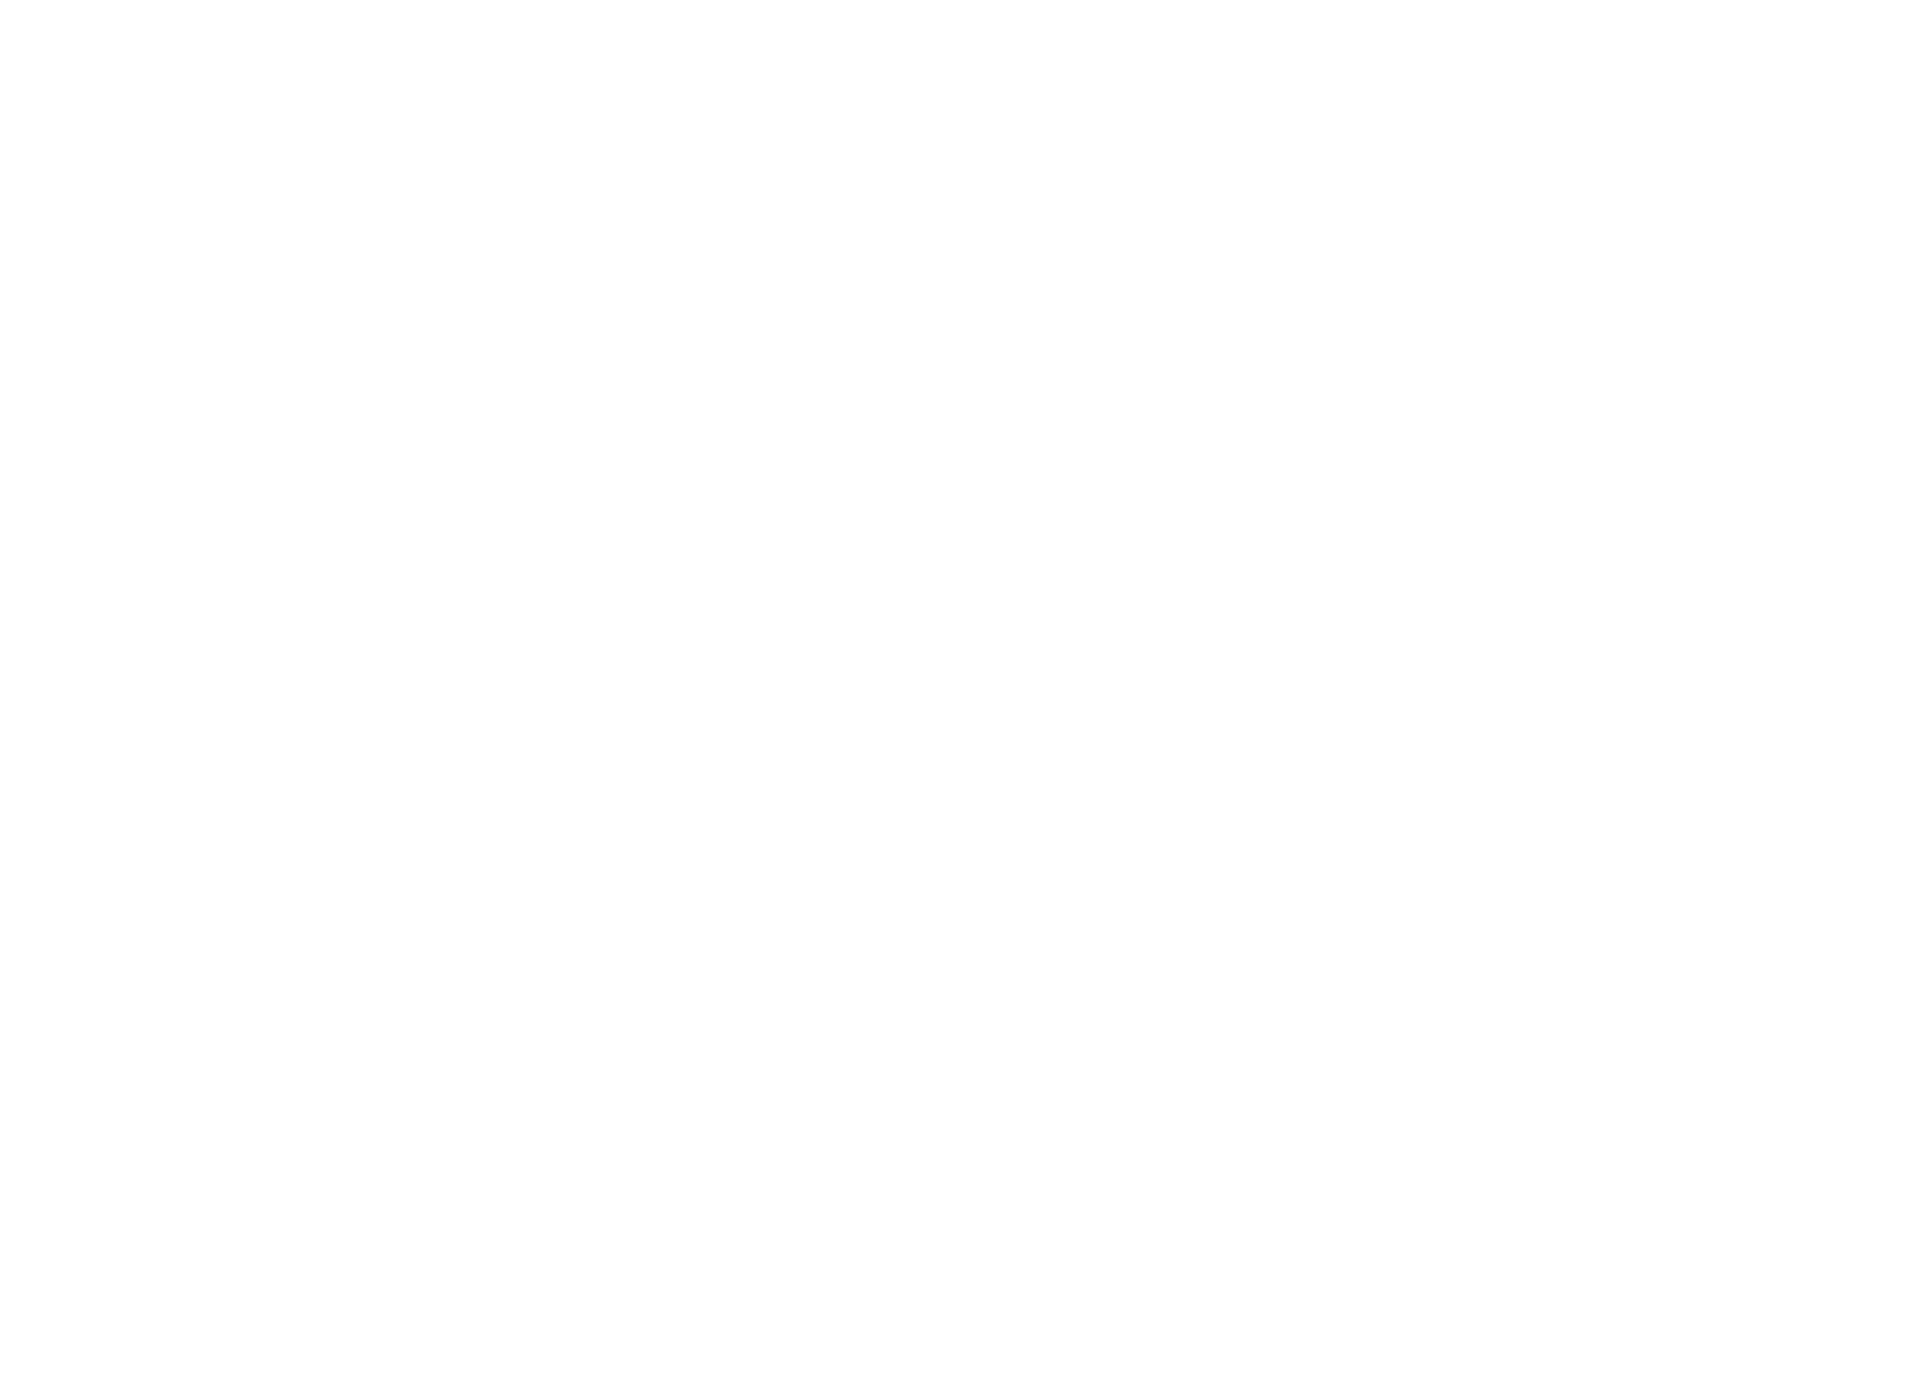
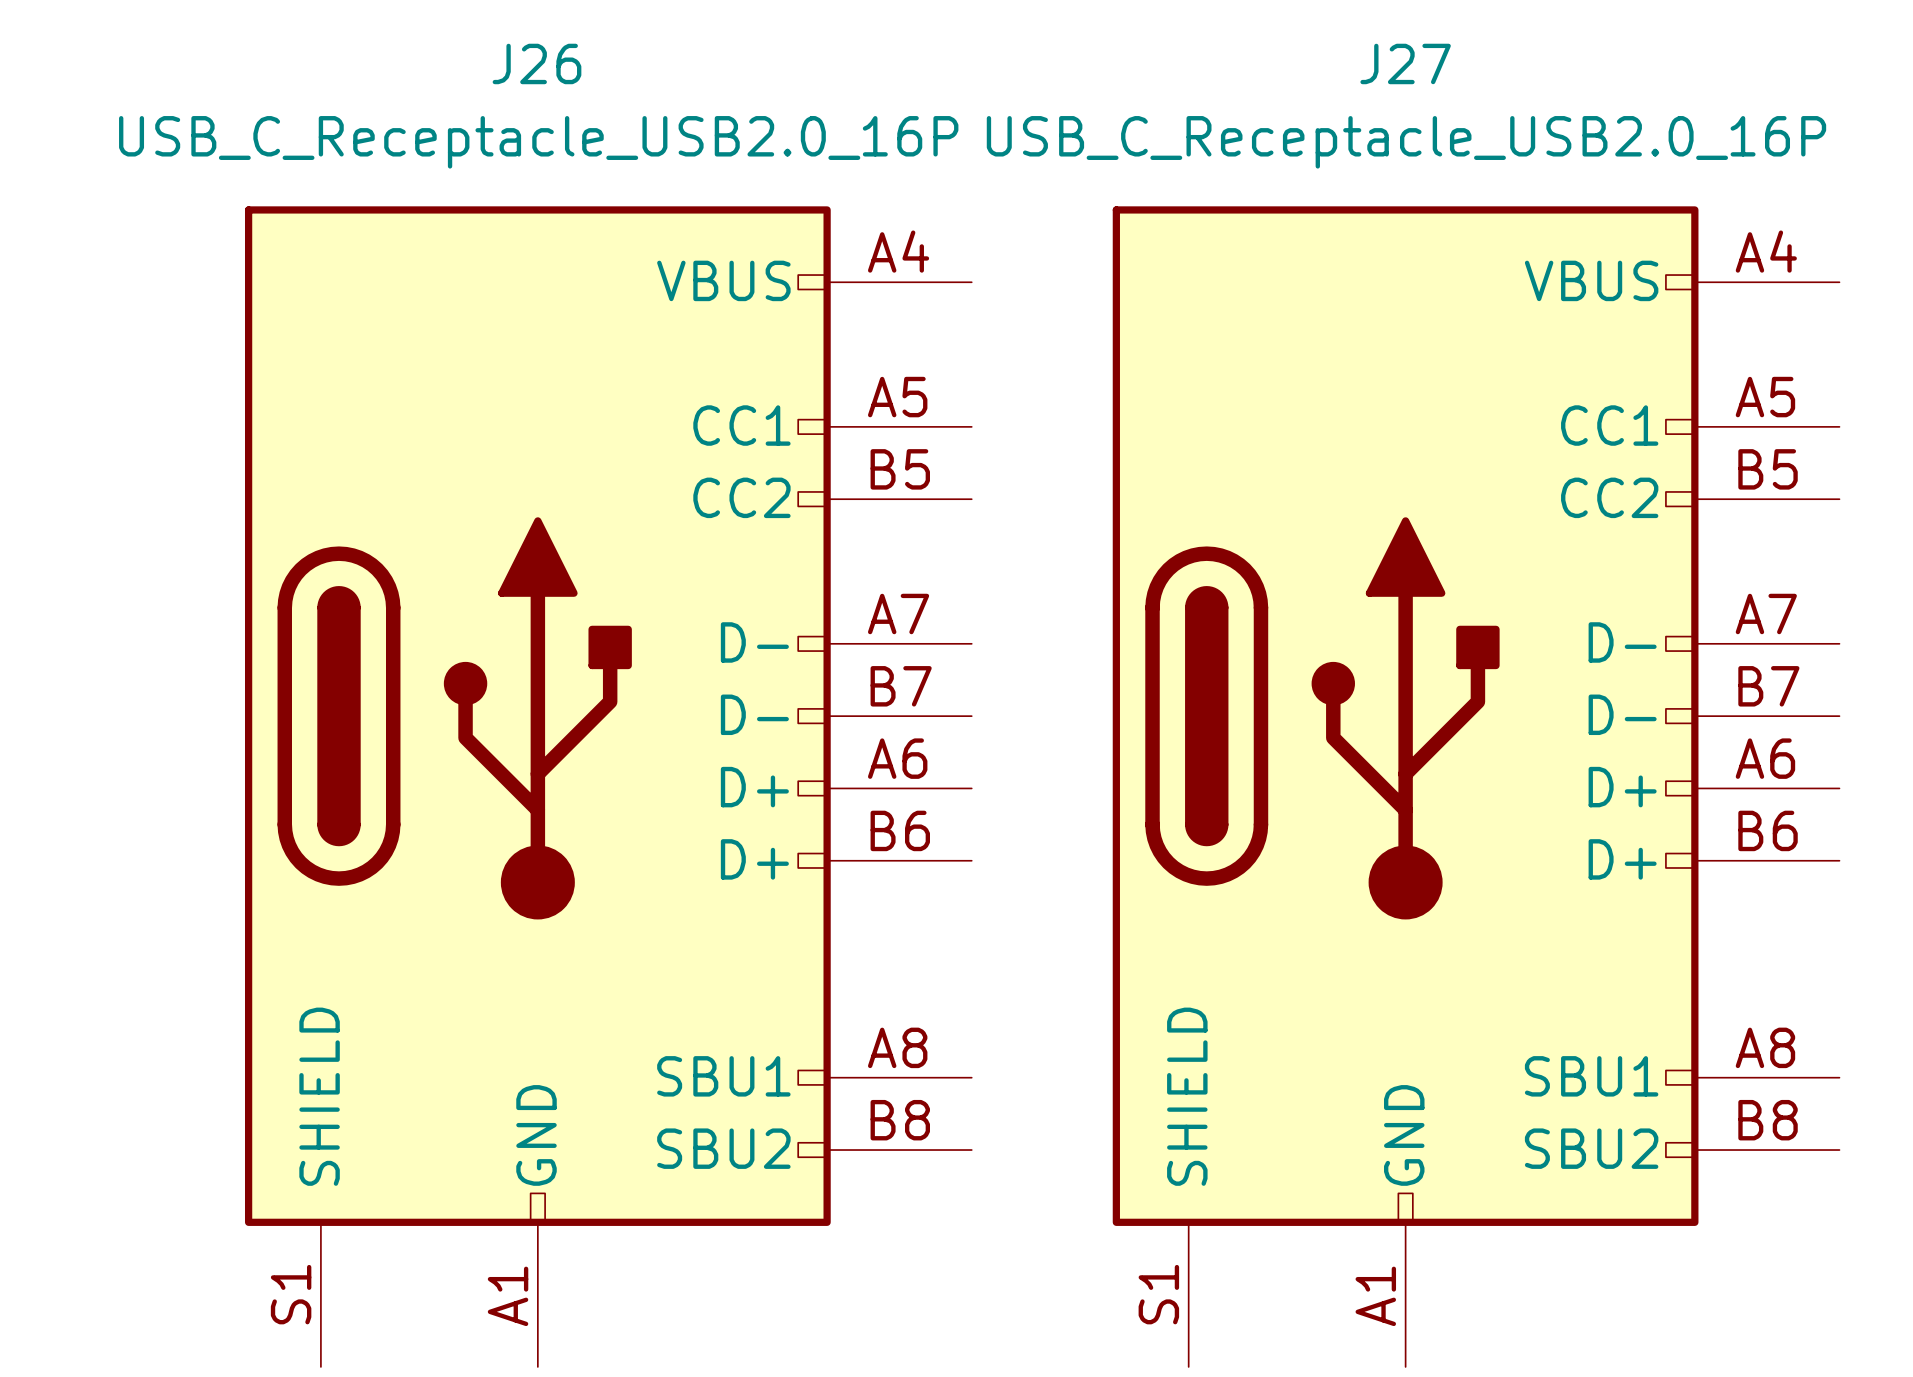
J26: none -> USB_C_Receptacle_USB2.0_16P (608, 786)
J27: none -> USB_C_Receptacle_USB2.0_16P (1476, 786)

